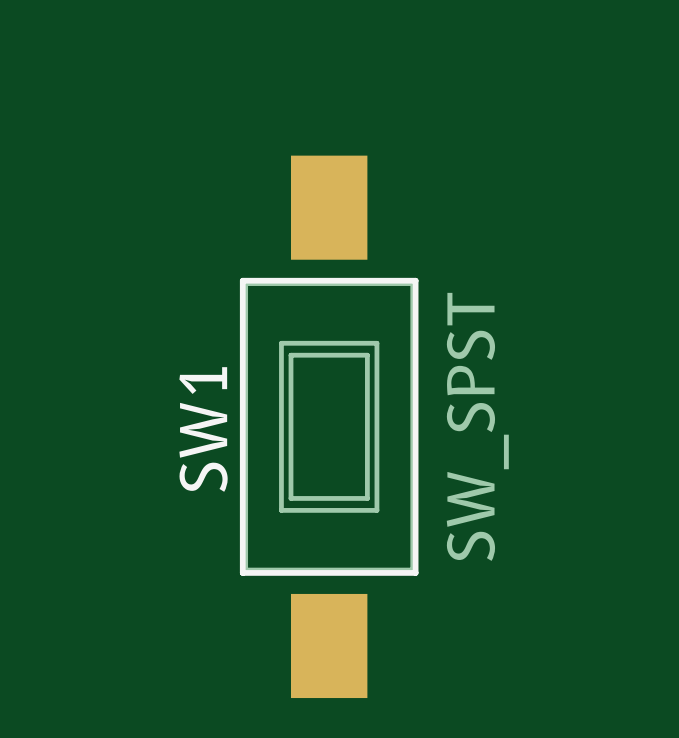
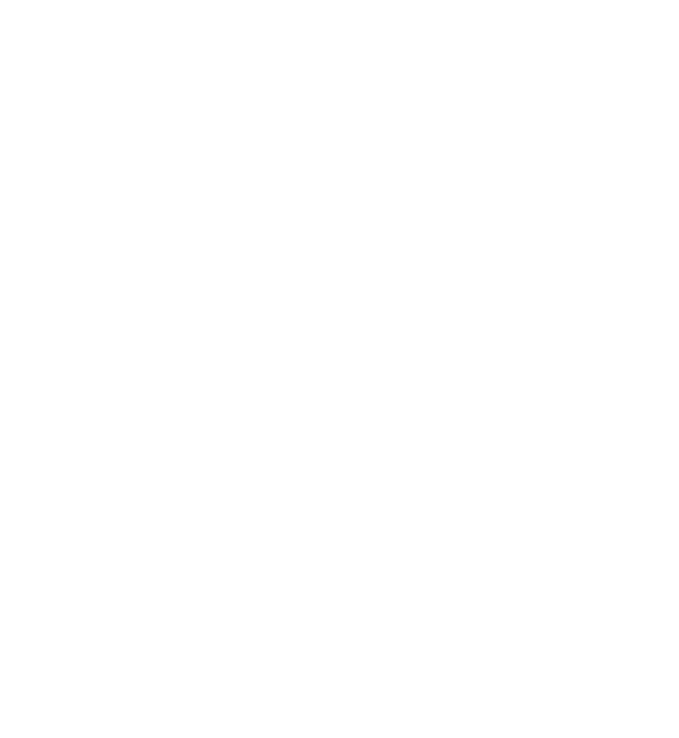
SW1: SW_SPST (329, 426) -> none

